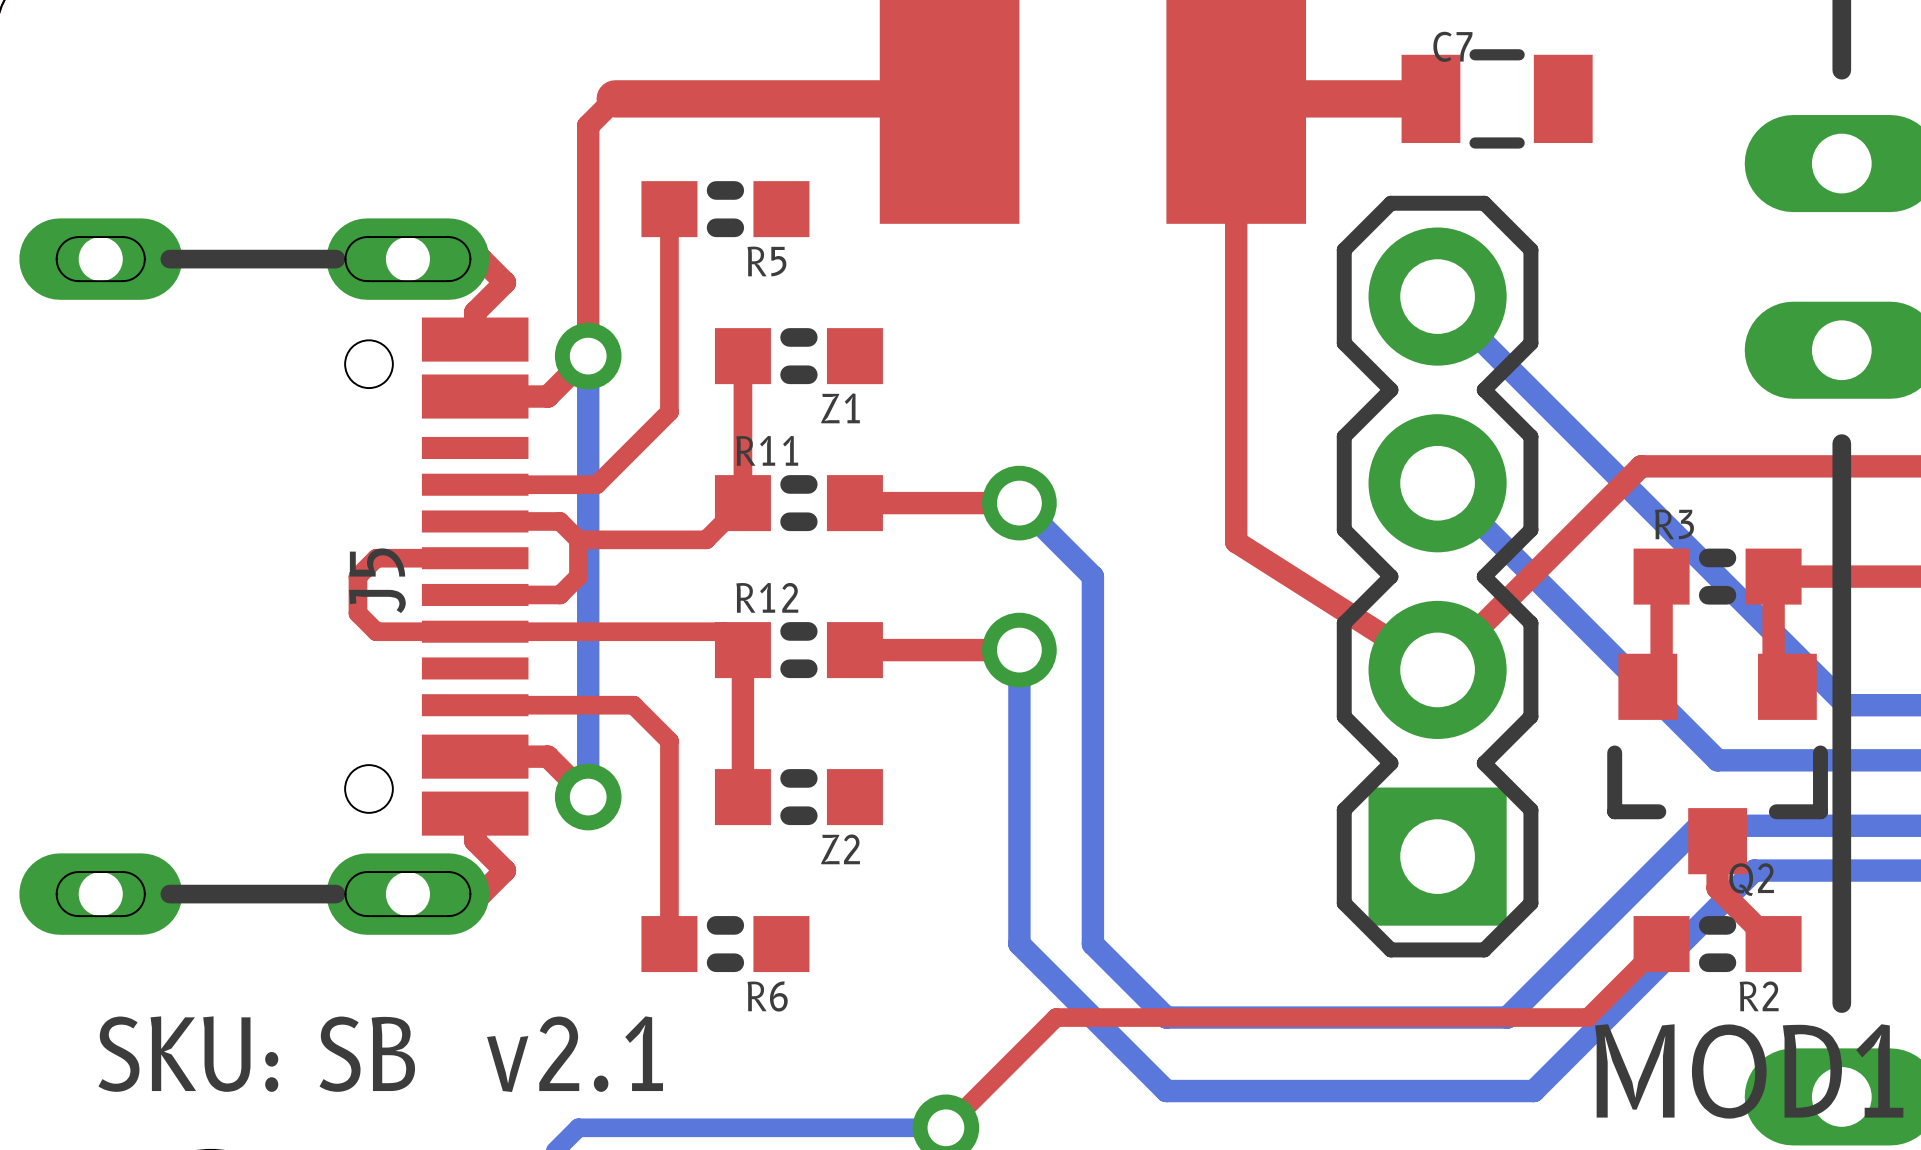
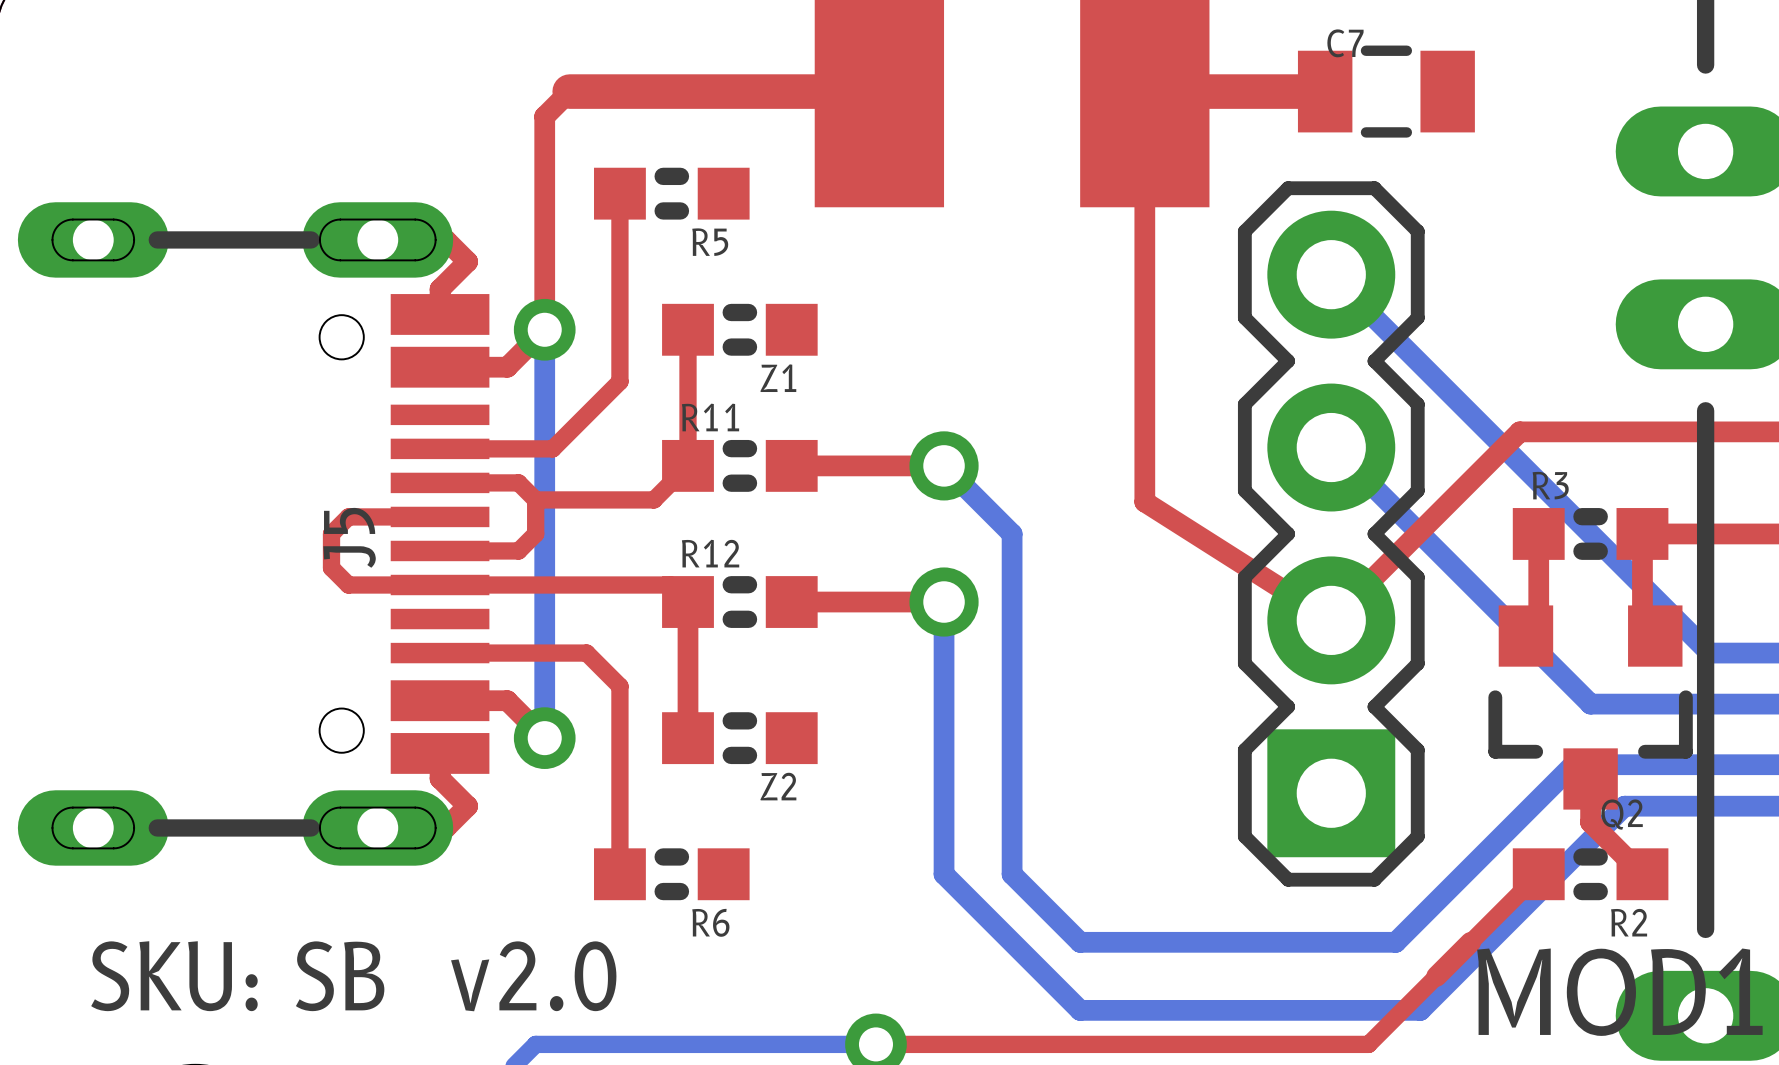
top track: (1588, 1017) (1056, 1017) (945, 1127) -> (1470, 942) (1368, 1044) (875, 1044)
text: SKU: SB v2.1 (380, 1054) -> SKU: SB v2.0 (353, 976)

